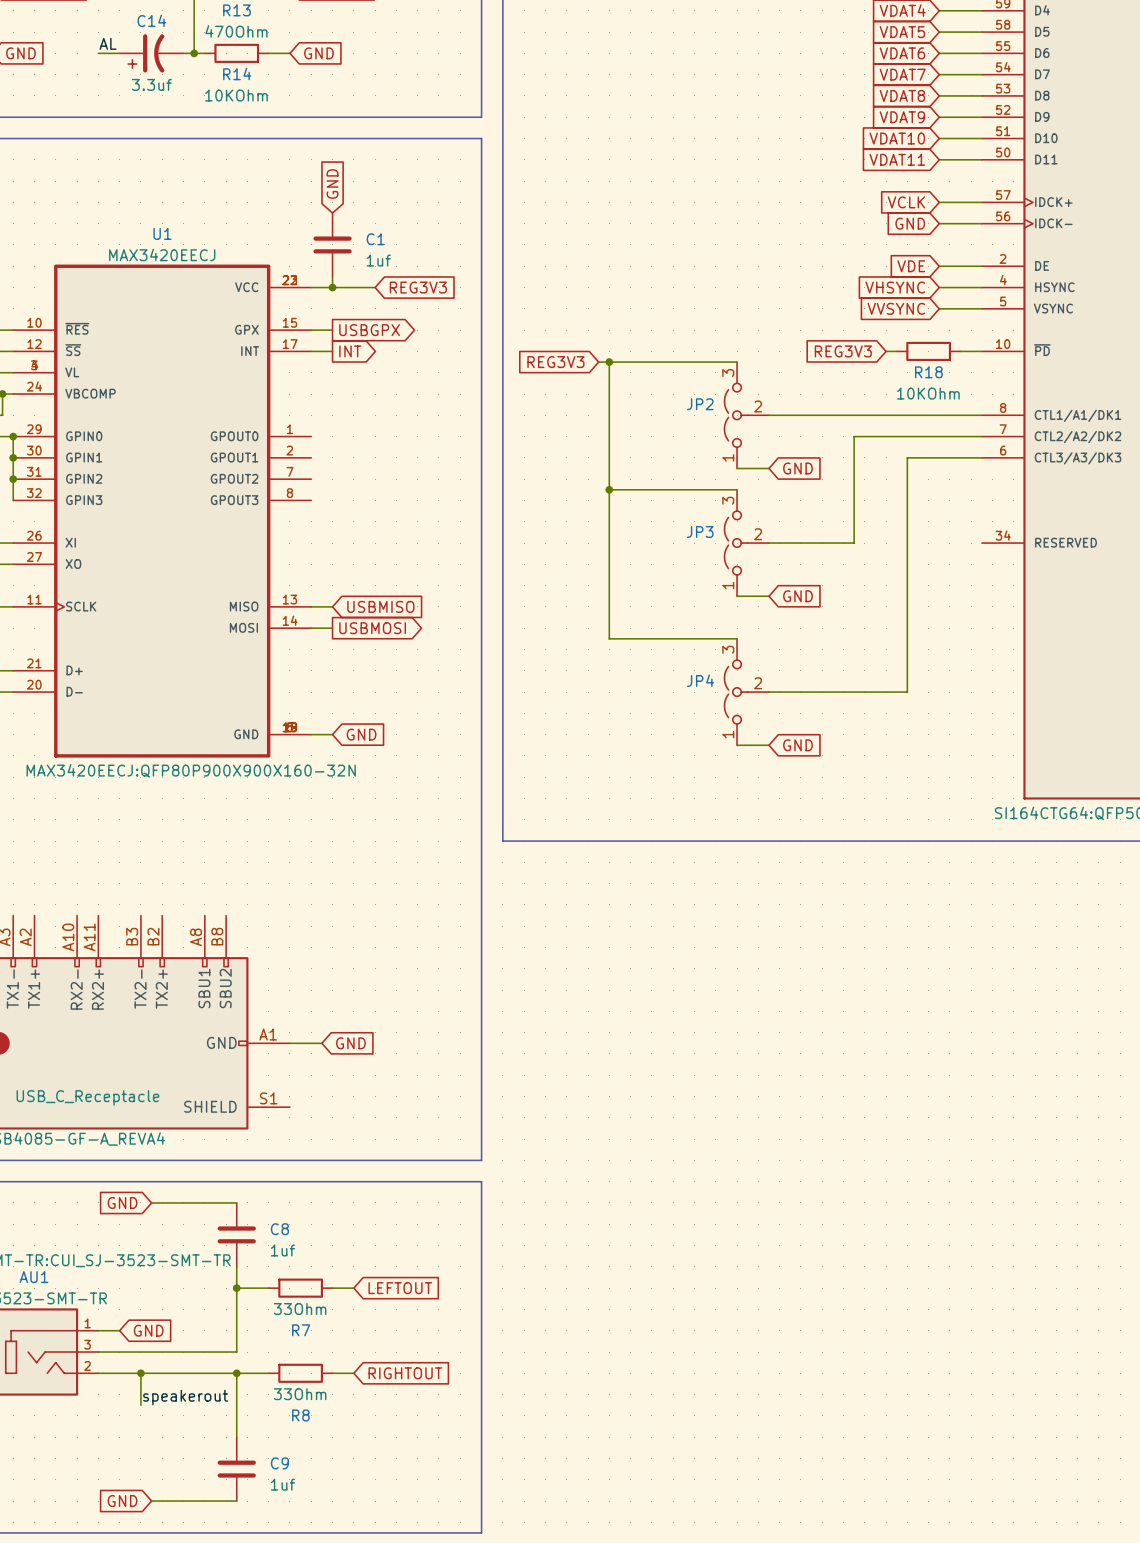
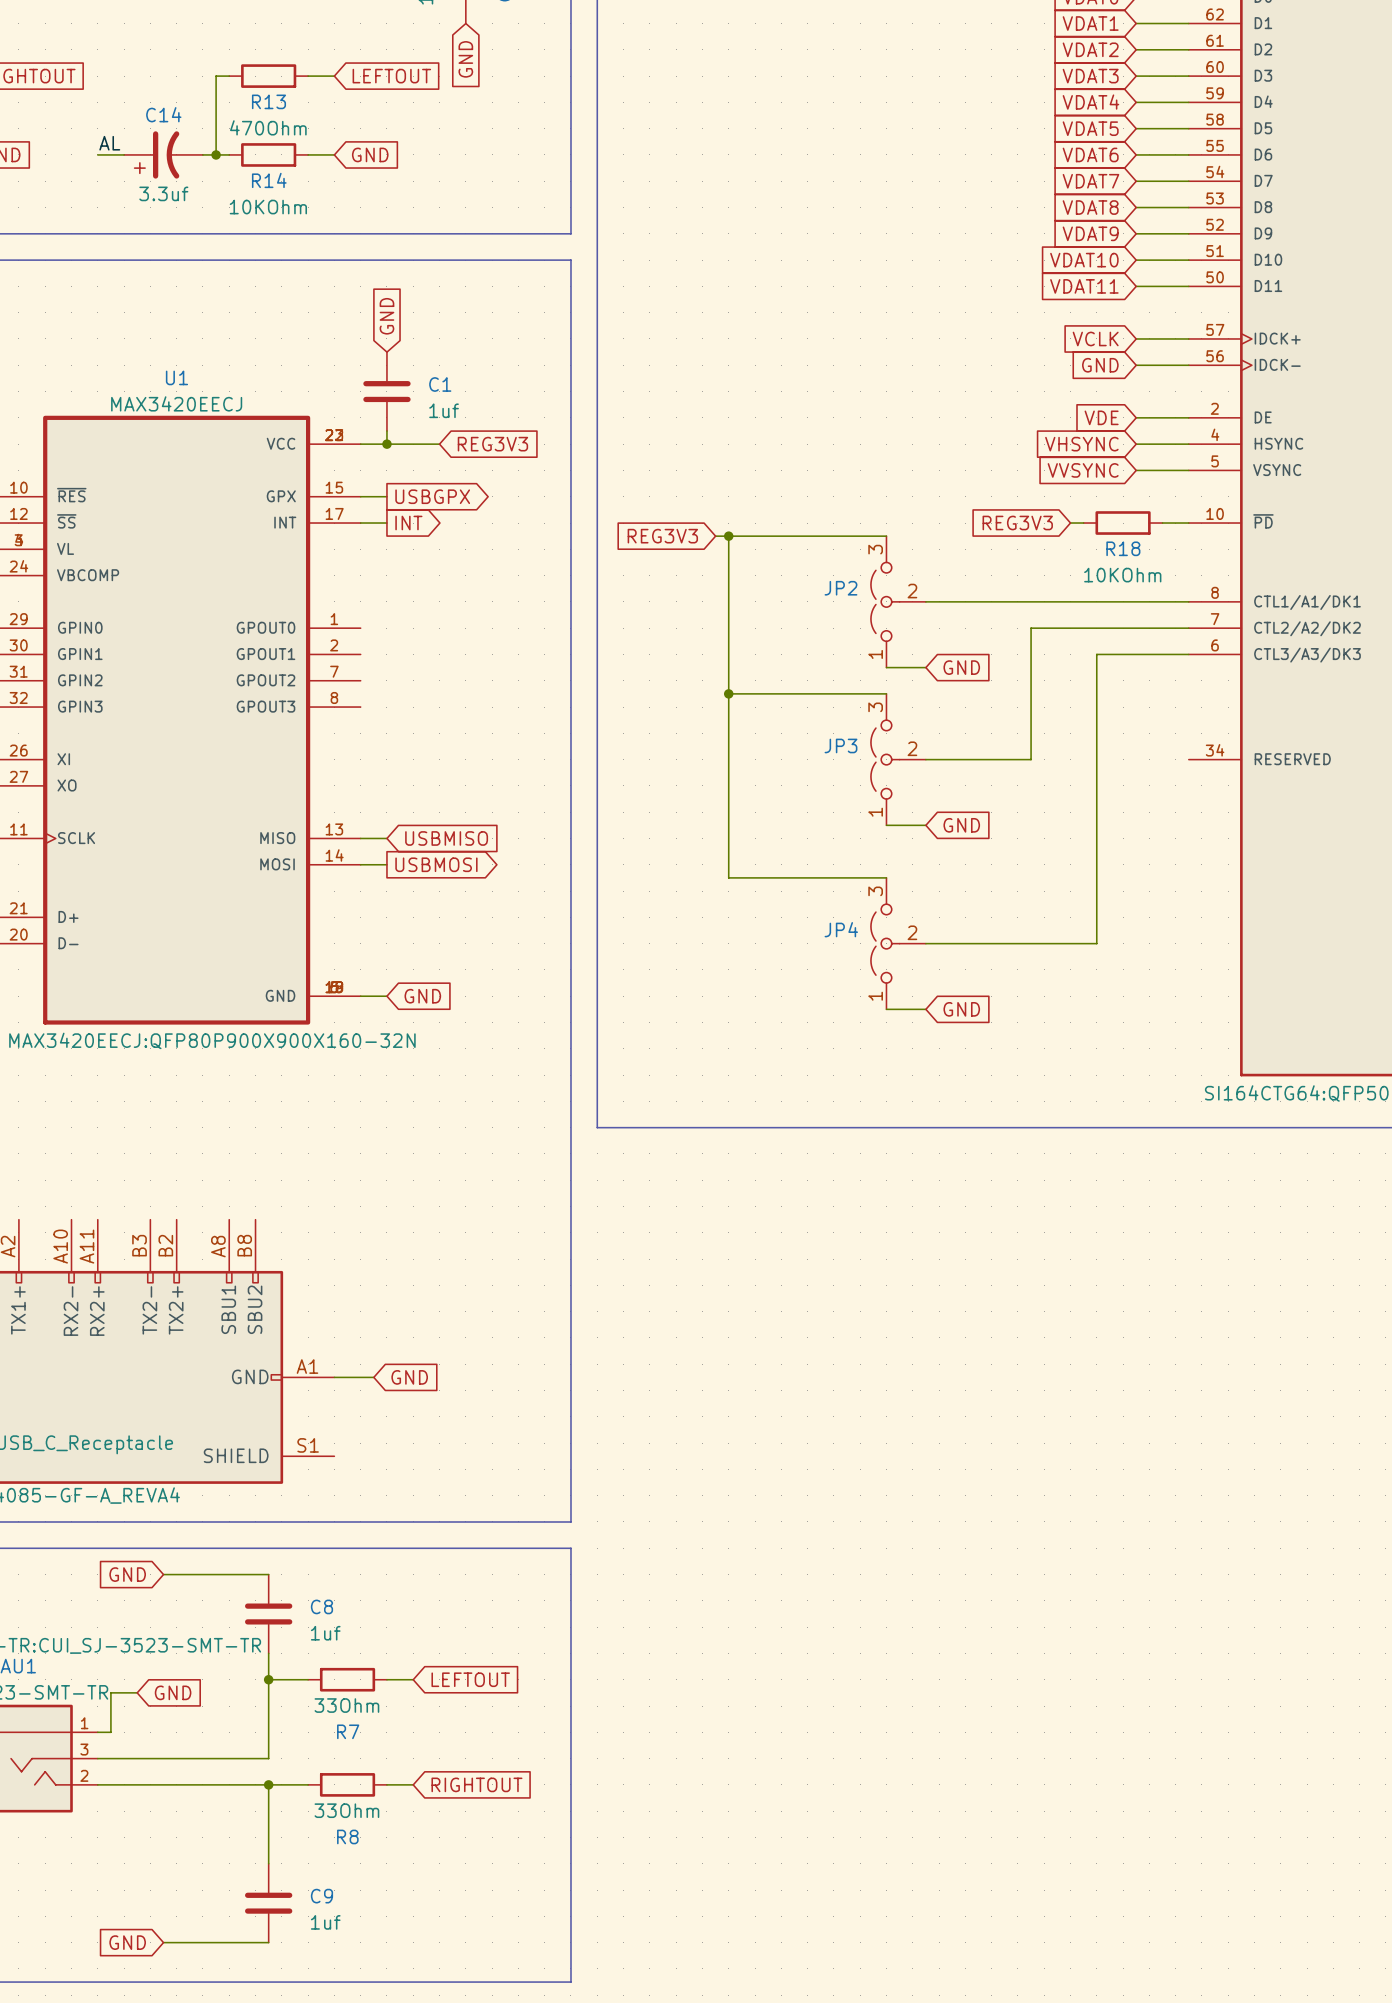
wire: (109, 1330) (119, 1330) -> (110, 1732) (110, 1692) (137, 1692)
global label position: GND (148, 1330) -> GND (173, 1692)
wire: (140, 1373) (140, 1405) -> none
junction: (140, 1373) -> none
label: speakerout (185, 1397) -> none

